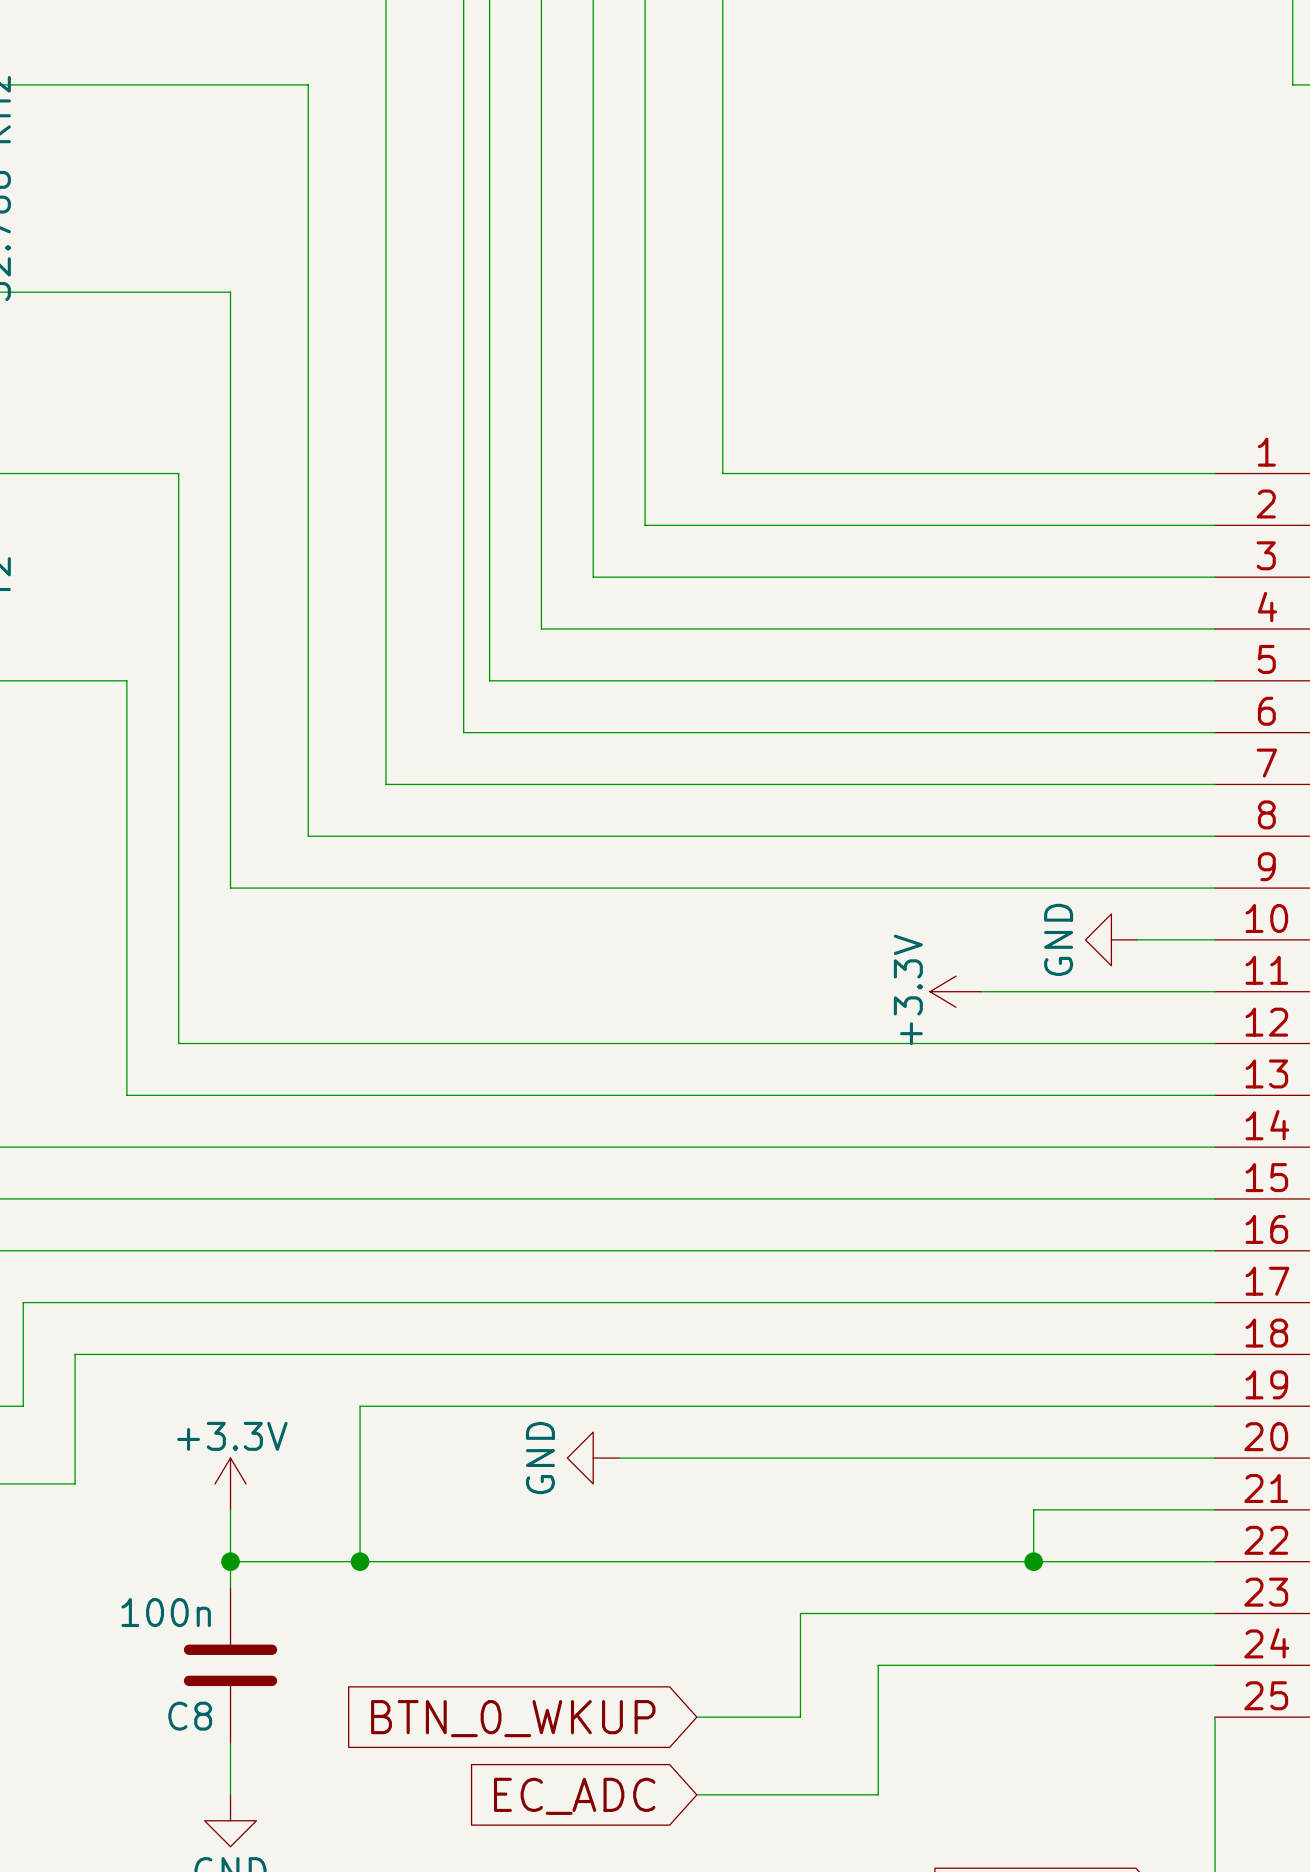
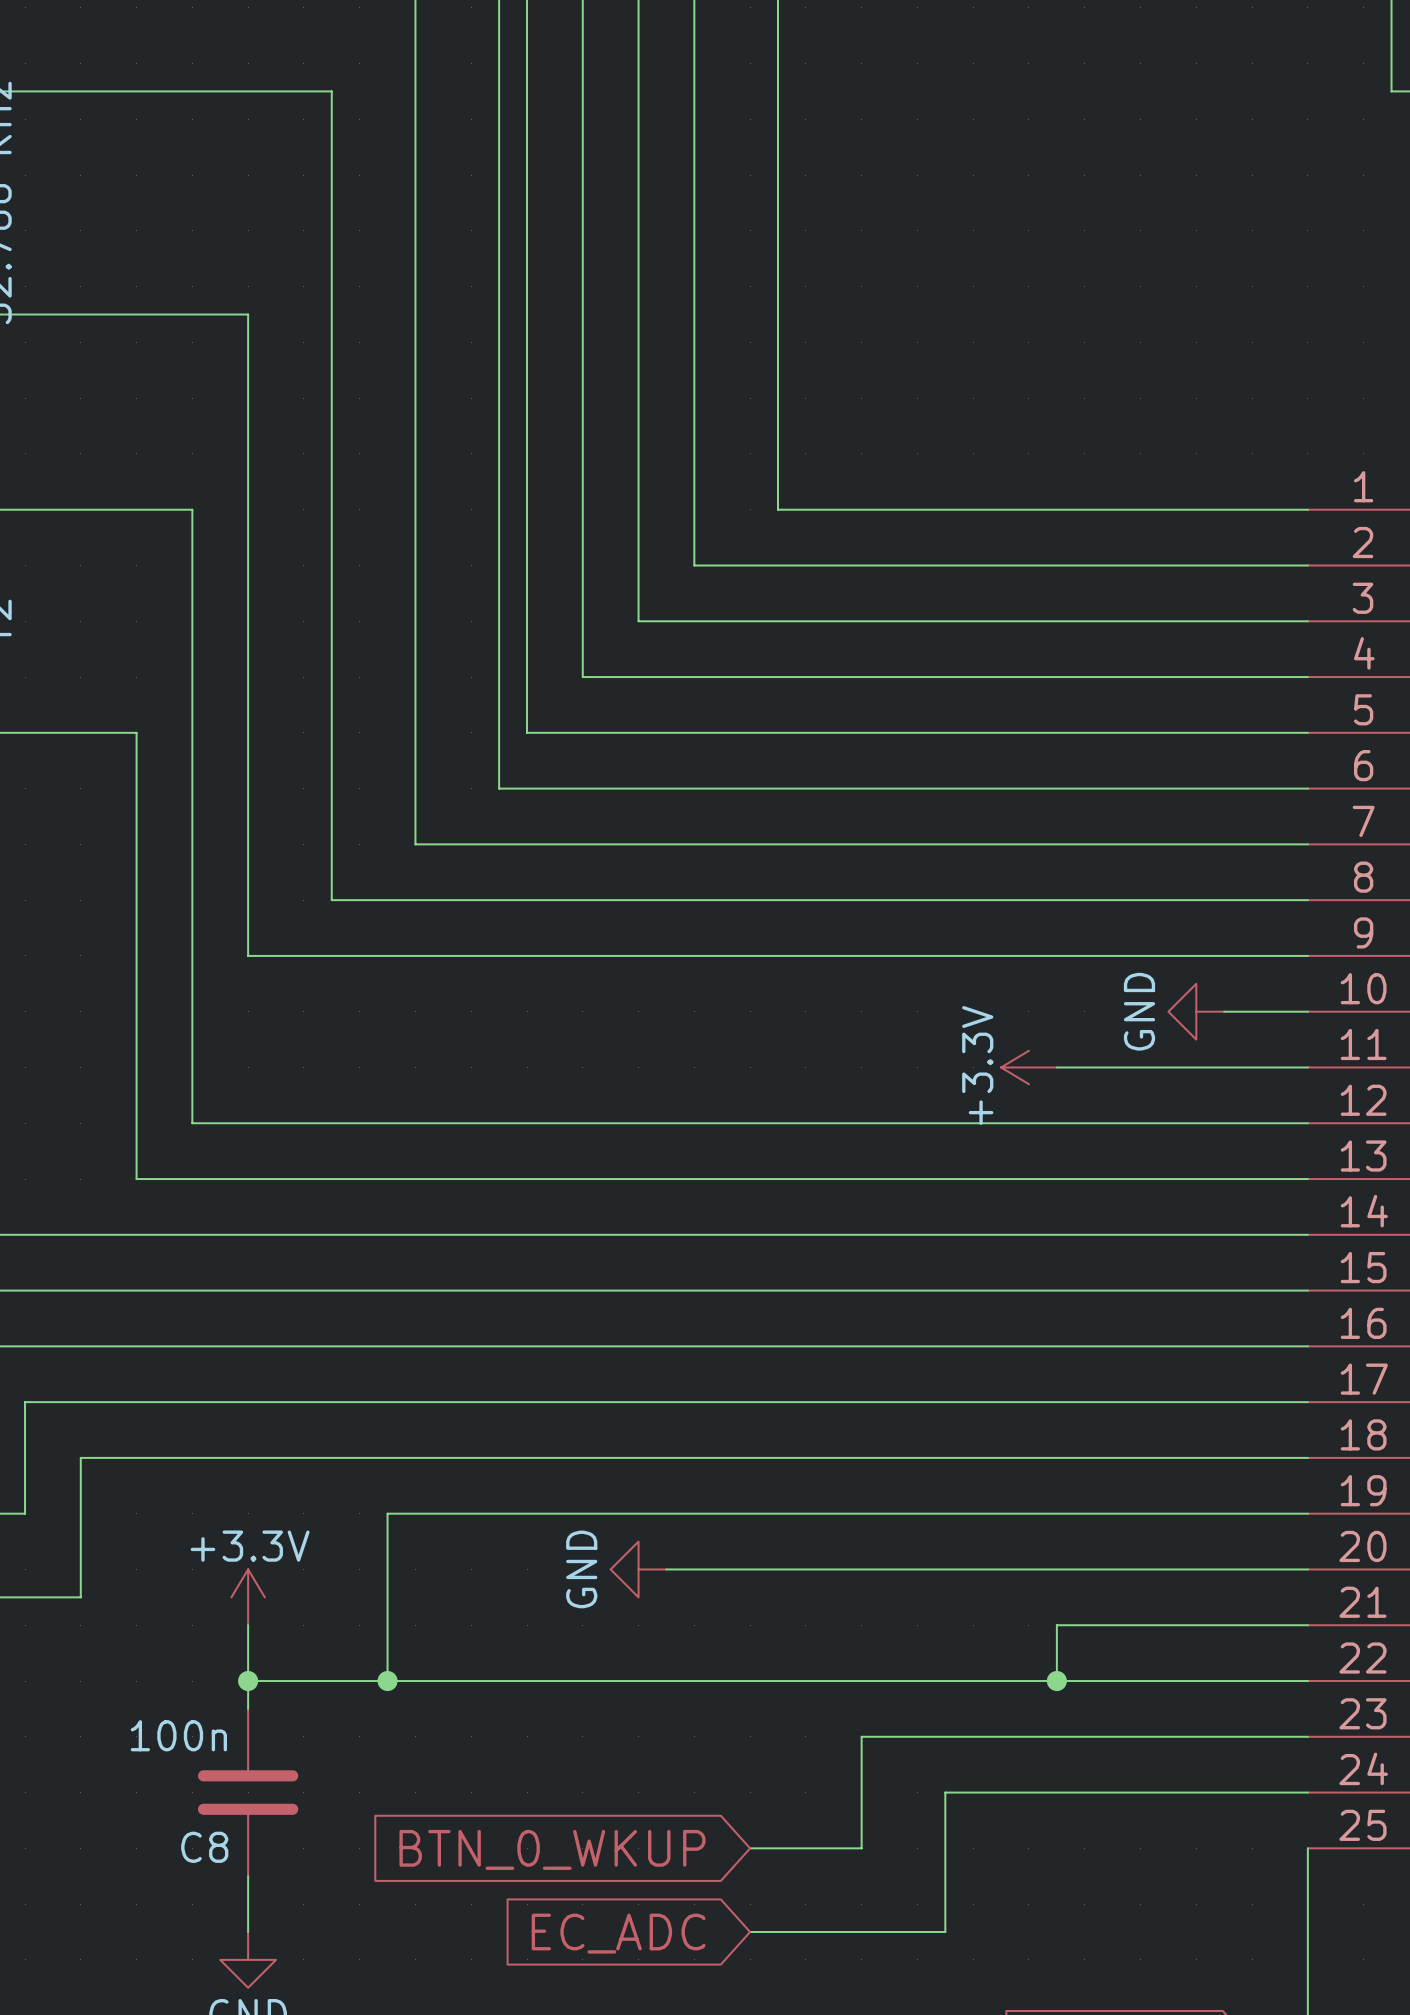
wire: (1033, 1509) (1033, 1561) -> (1112, 1625) (1056, 1625) (1056, 1681)
junction position: (1033, 1561) -> (1056, 1681)

